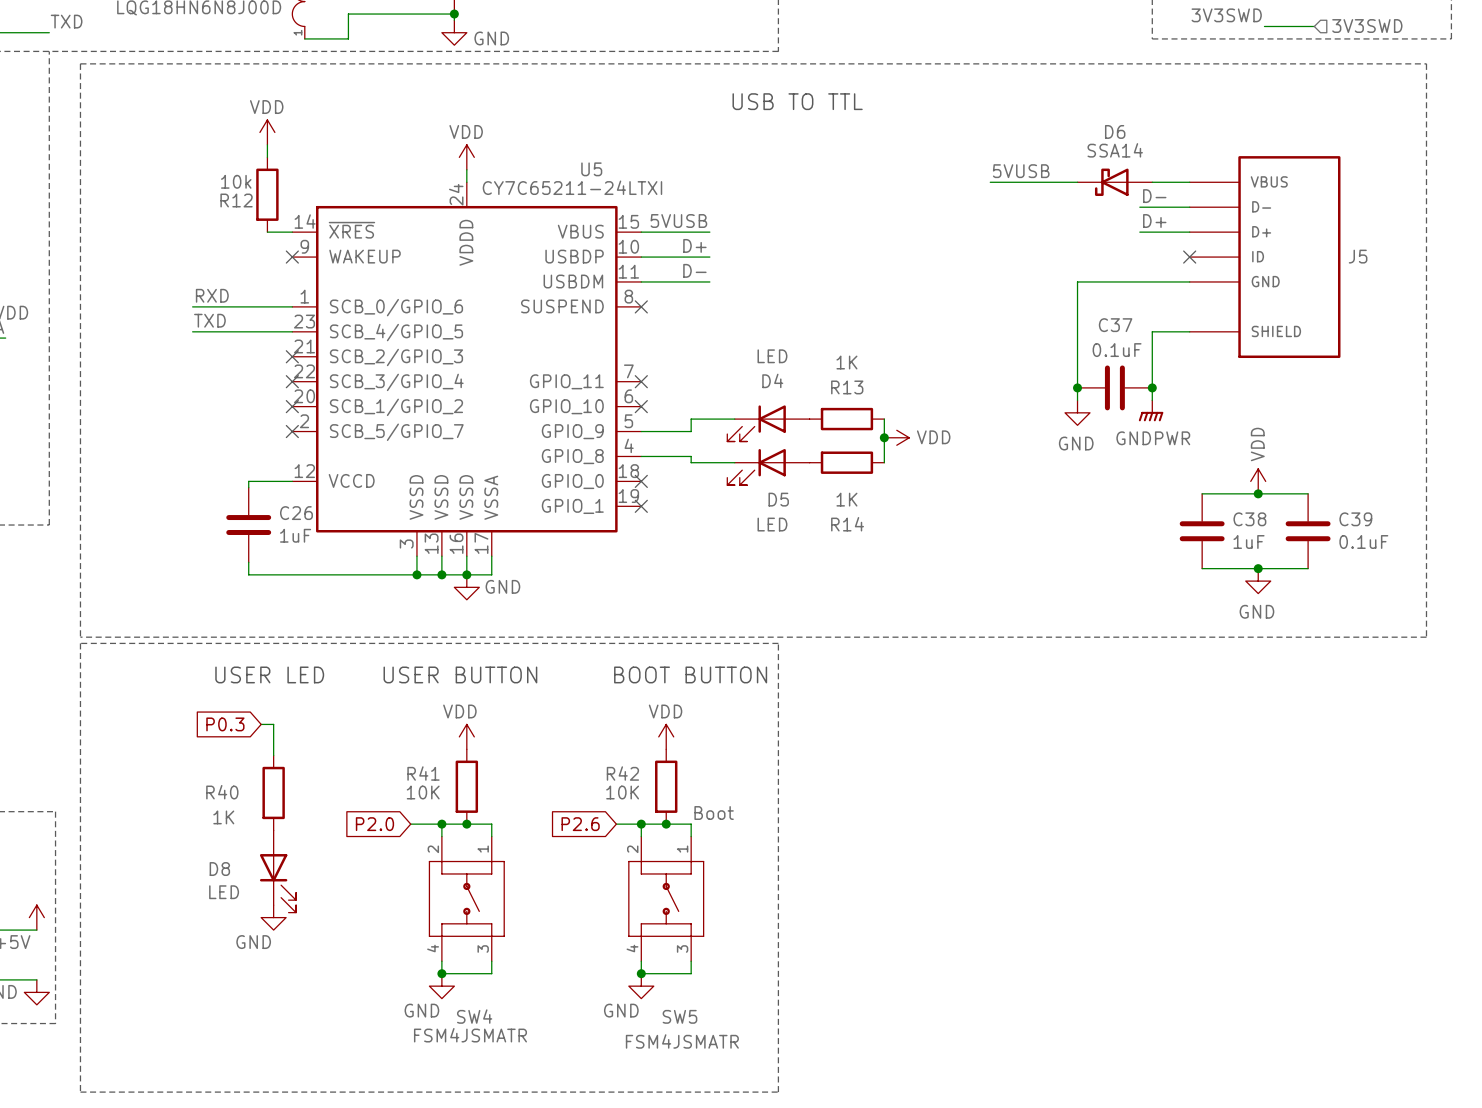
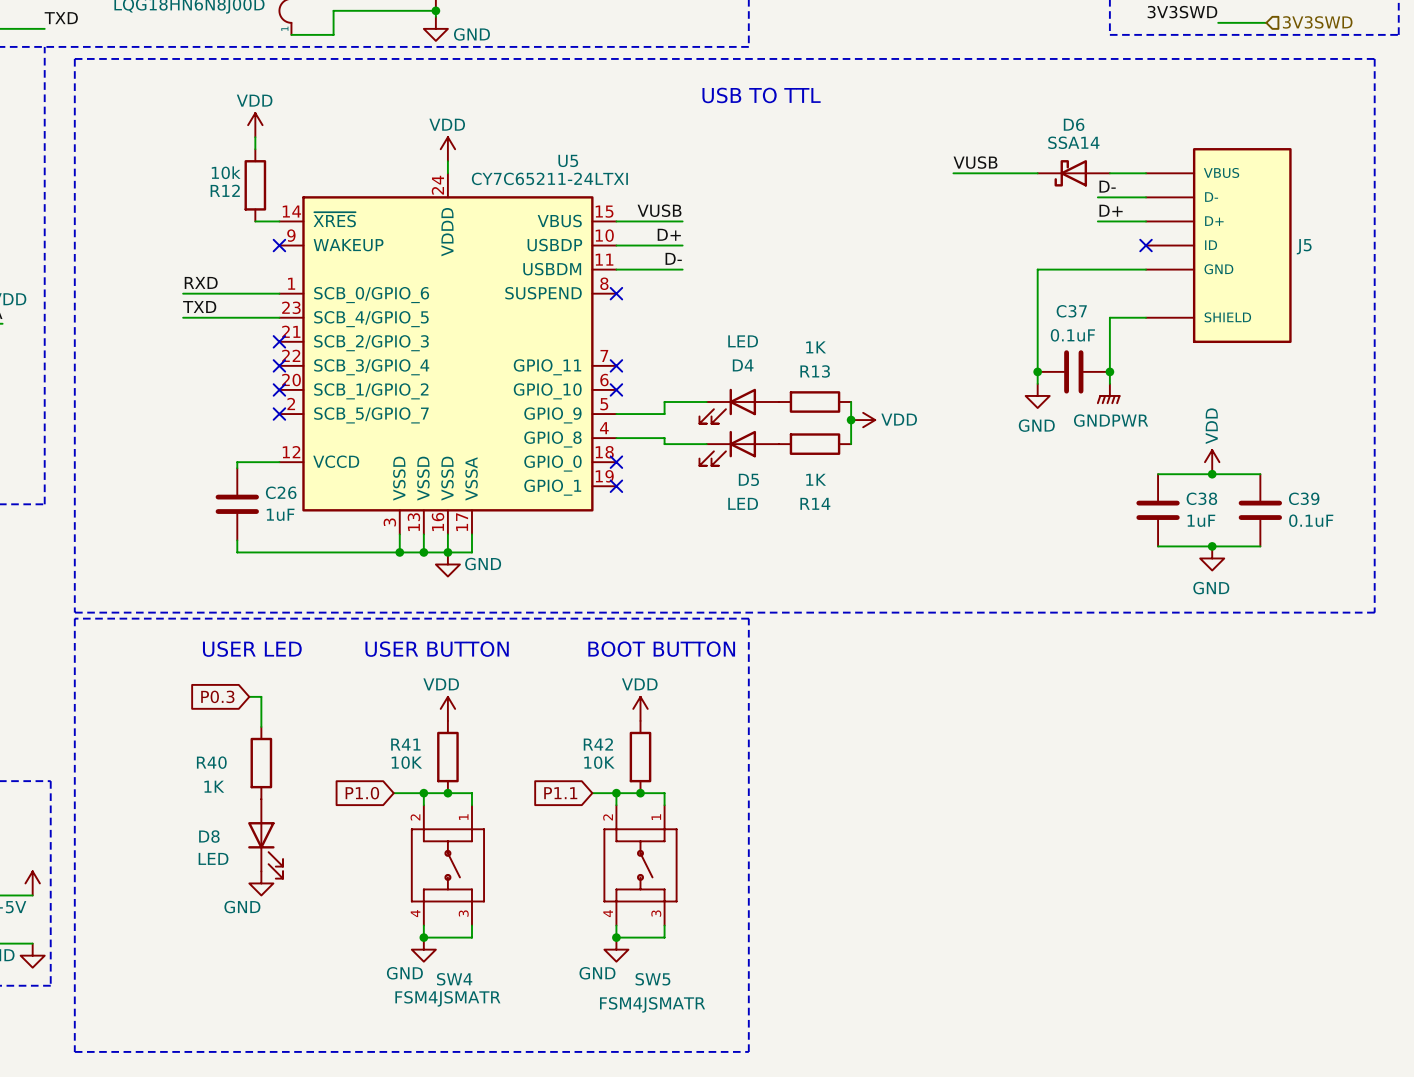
label: 5VUSB (1021, 171) -> VUSB (975, 162)
label: 5VUSB (678, 221) -> VUSB (659, 210)
label: Boot (714, 813) -> none
global label: P2.0 (374, 824) -> P1.0 (362, 793)
global label: P2.6 (580, 824) -> P1.1 (560, 793)

